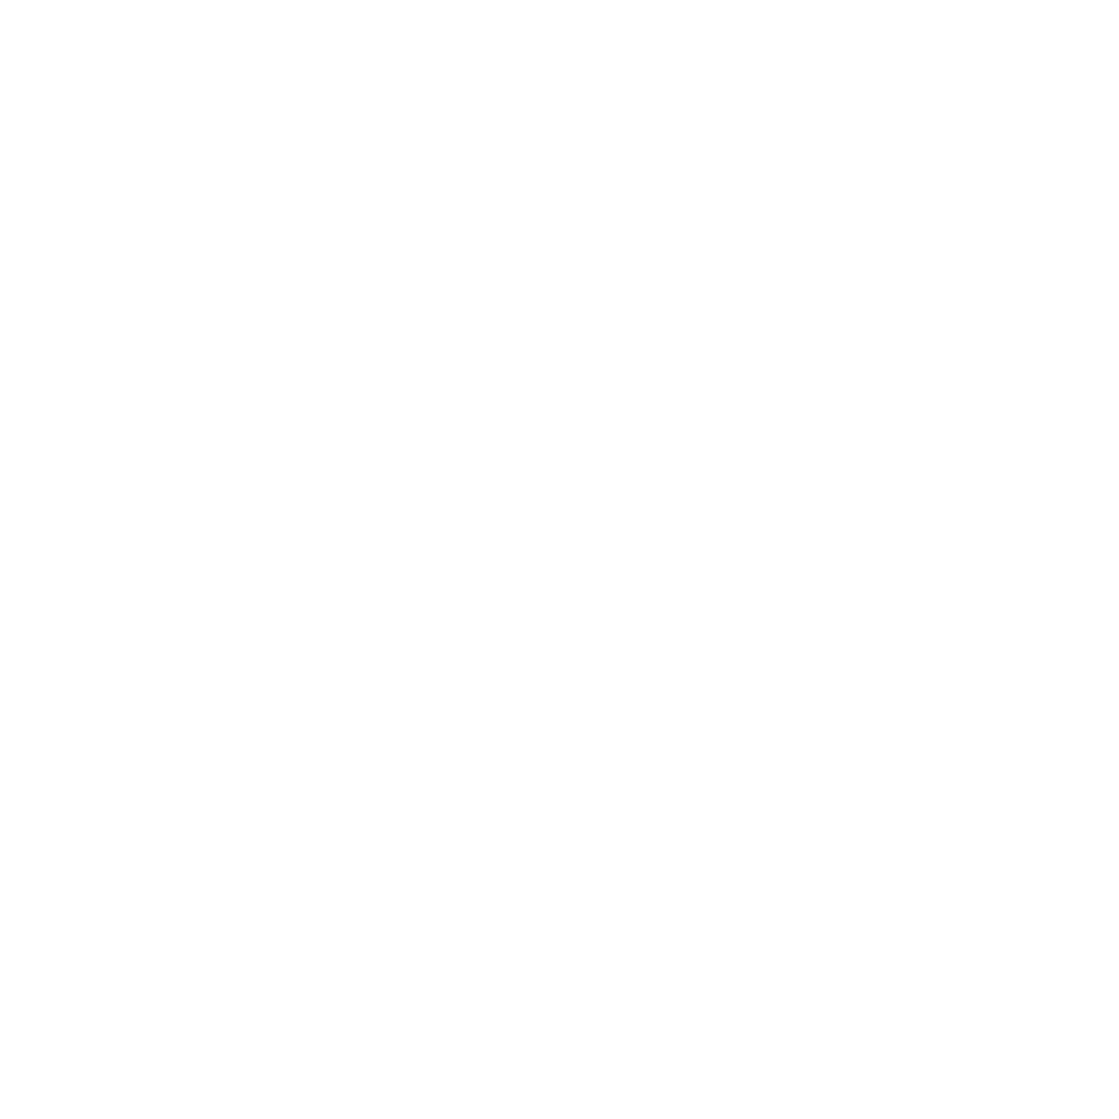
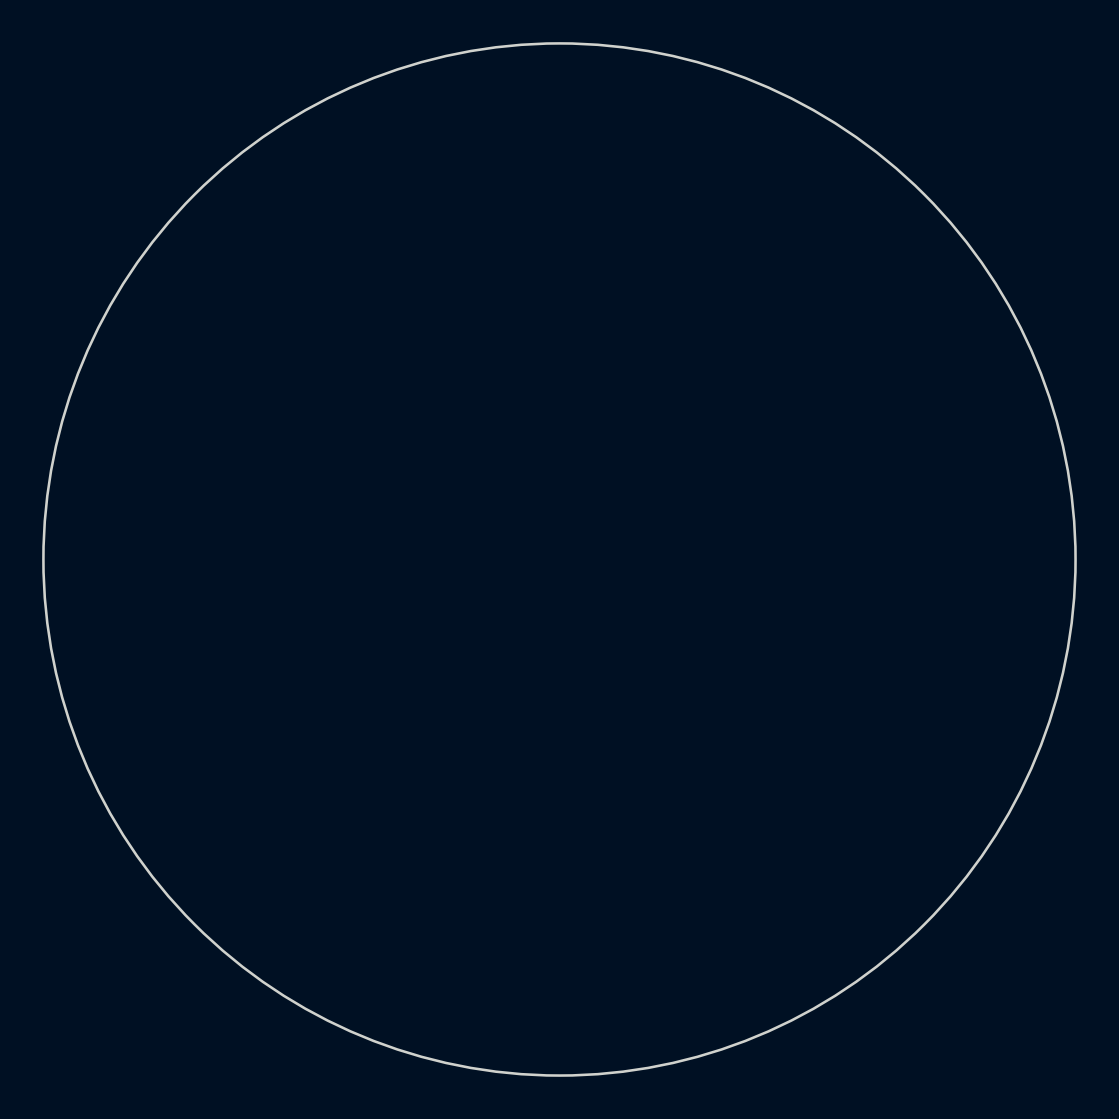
round board edge: none -> [42, 42, 1077, 1077]

